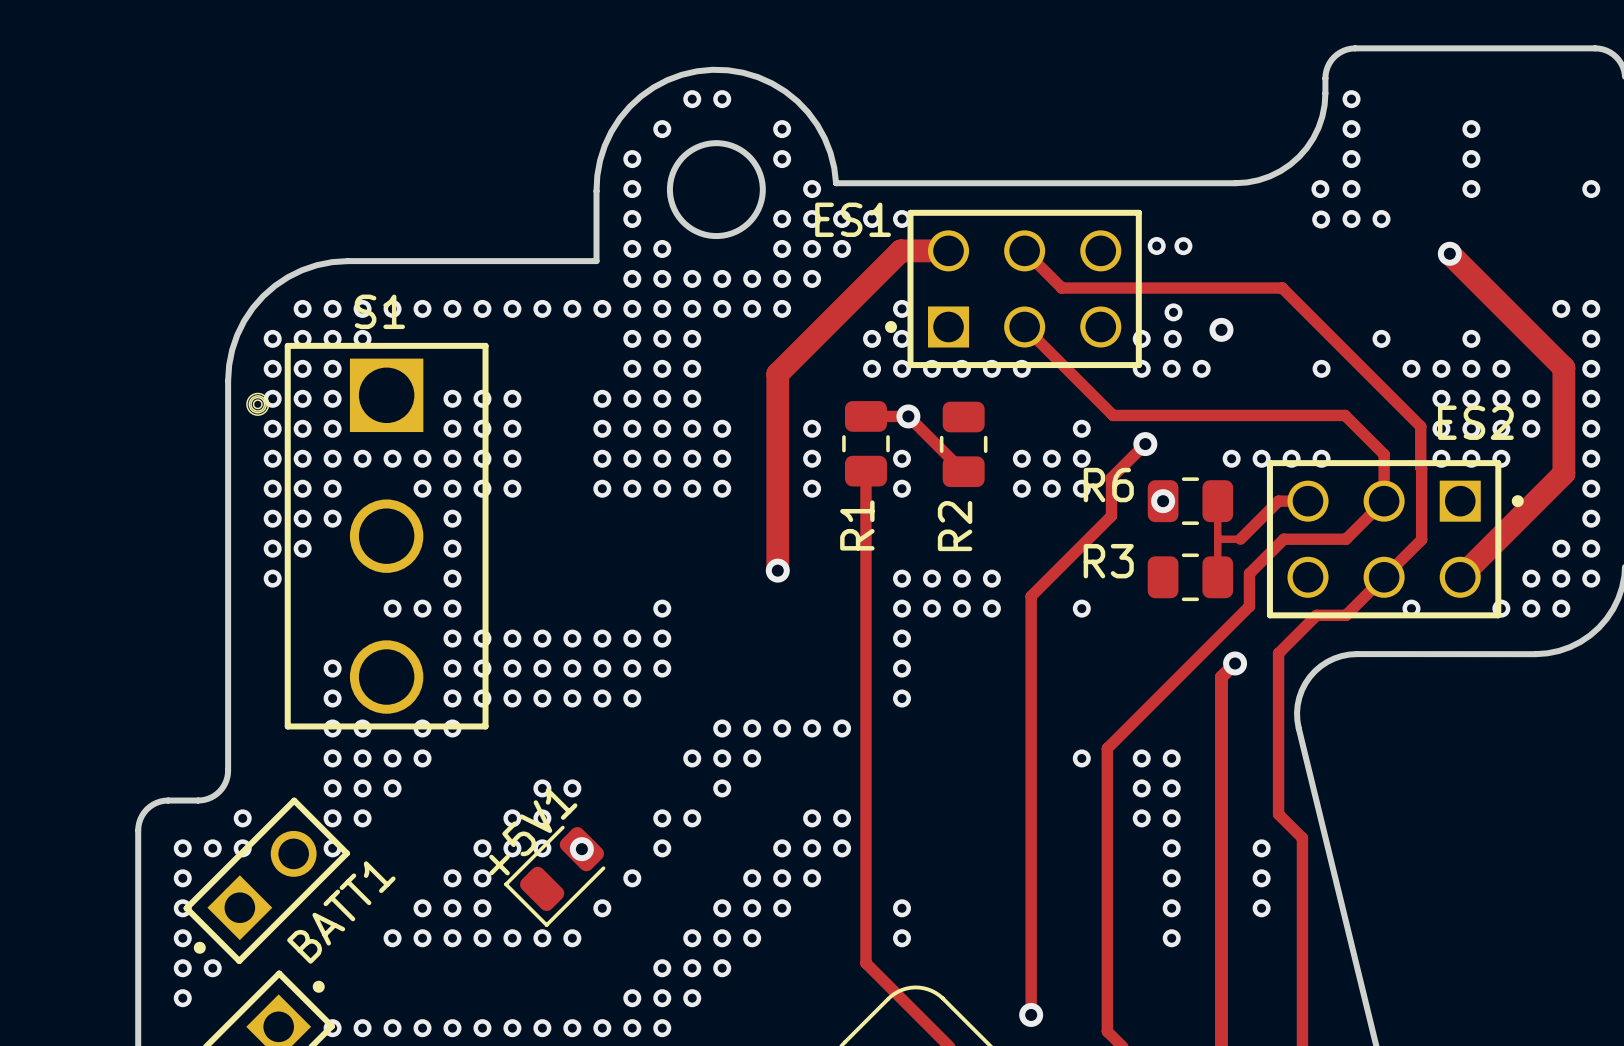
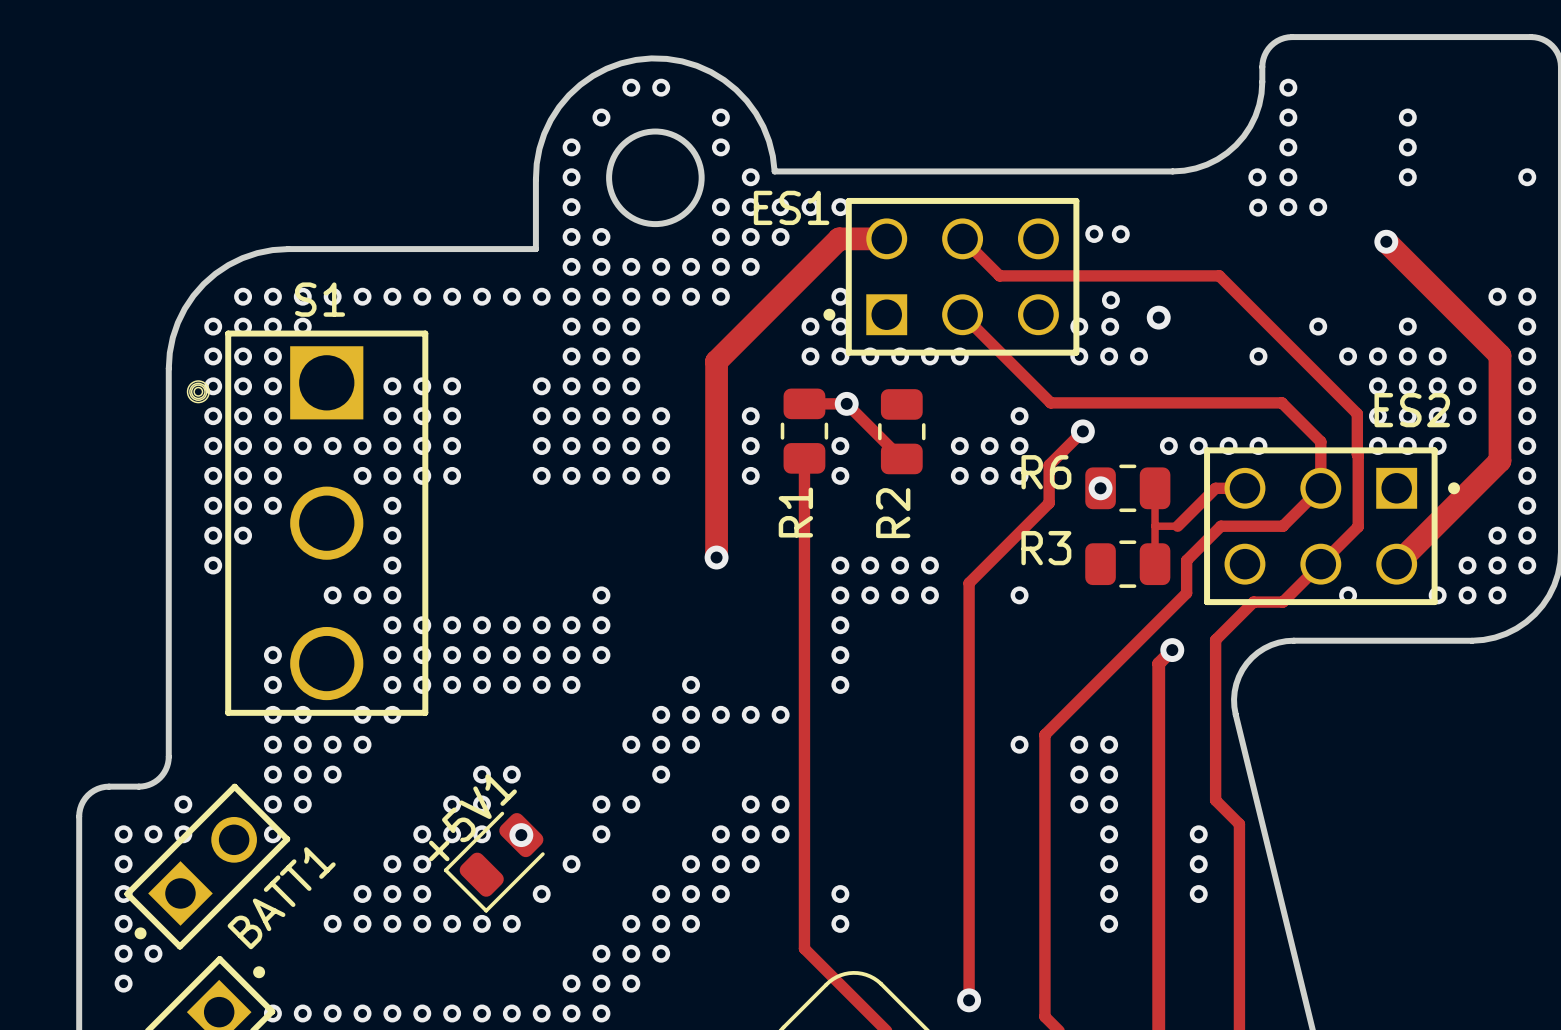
via: none -> (691, 684)

